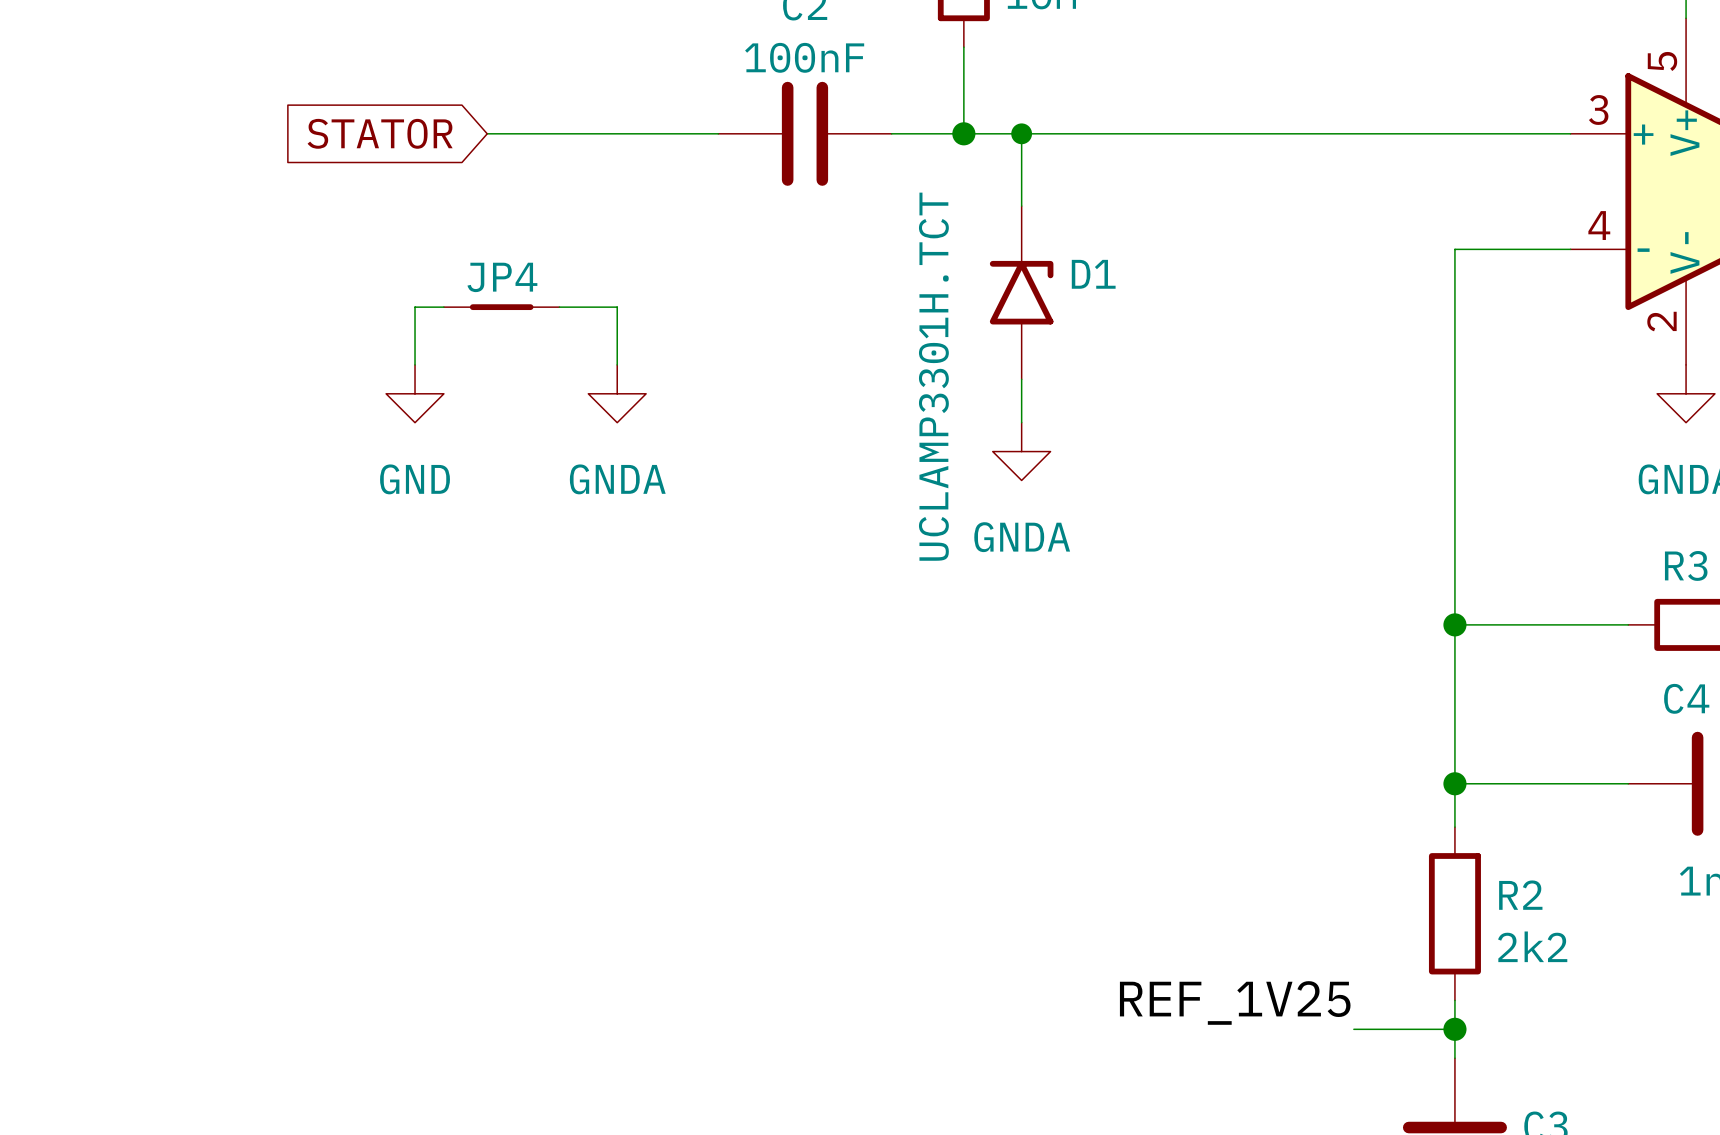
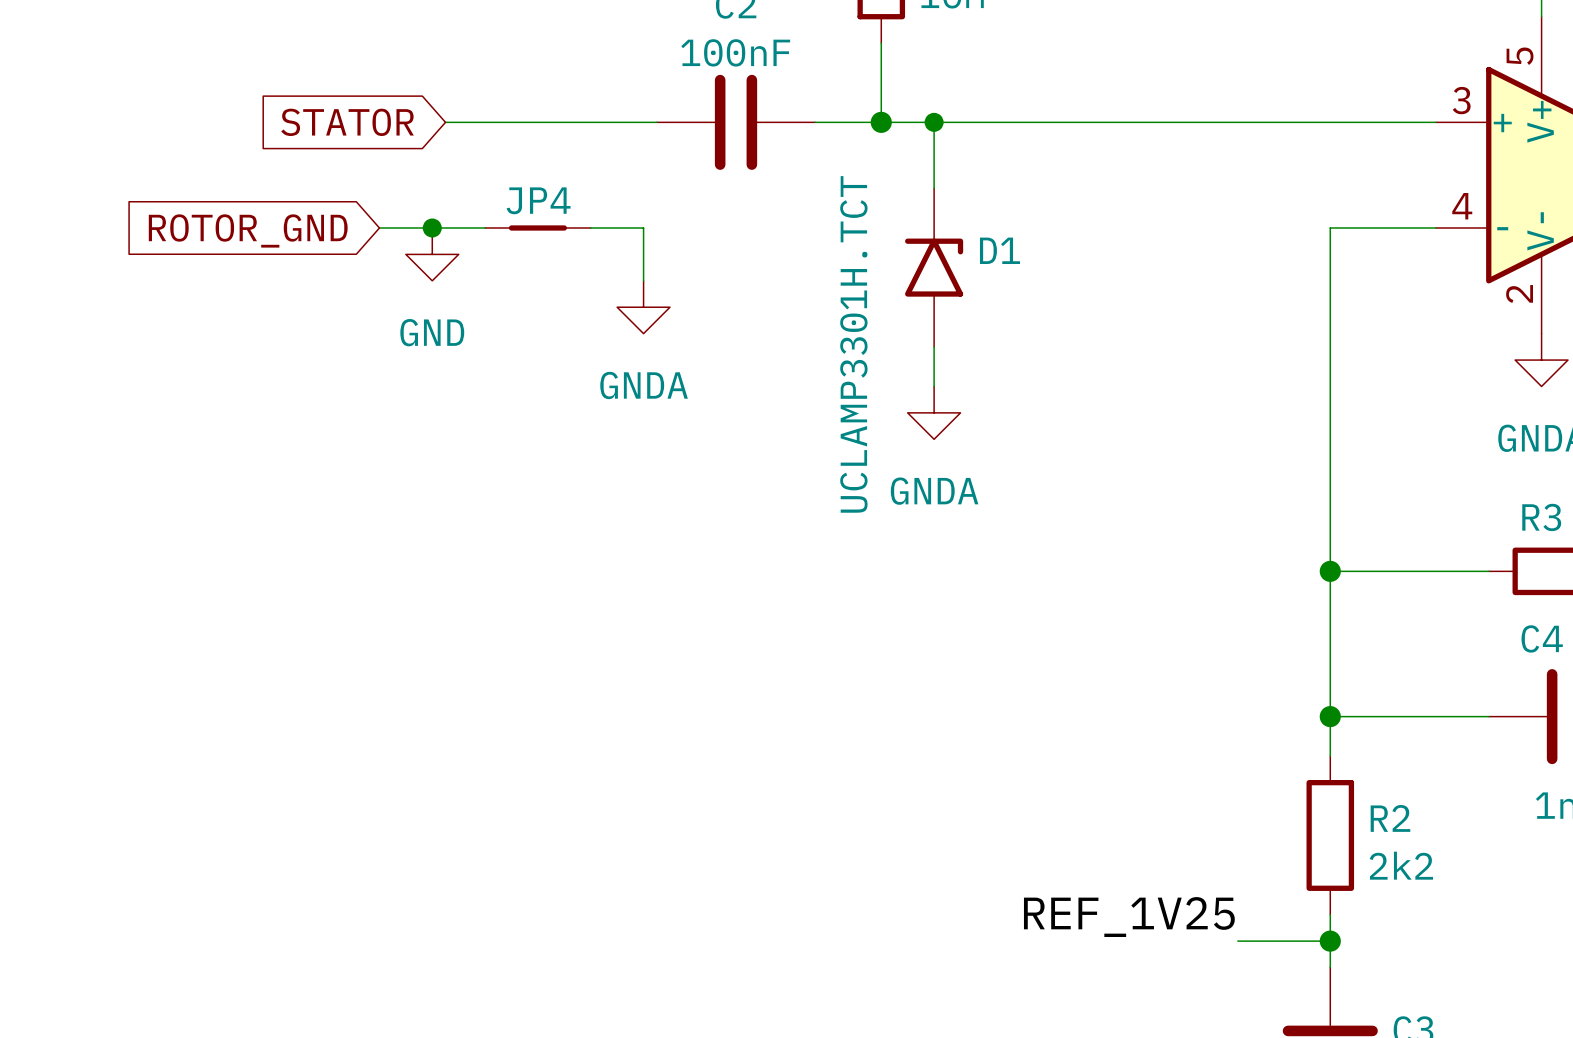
wire: none -> (379, 227) (485, 227)
junction: none -> (432, 227)
global label: none -> ROTOR_GND (248, 230)
wire: (443, 307) (415, 307) (415, 364) -> none
JP4 position: (501, 307) -> (537, 227)
wire: (559, 307) (617, 307) (617, 364) -> (590, 227) (643, 227) (643, 280)
power symbol position: GND (415, 393) -> GND (432, 254)
power symbol position: GNDA (617, 393) -> GNDA (643, 307)

